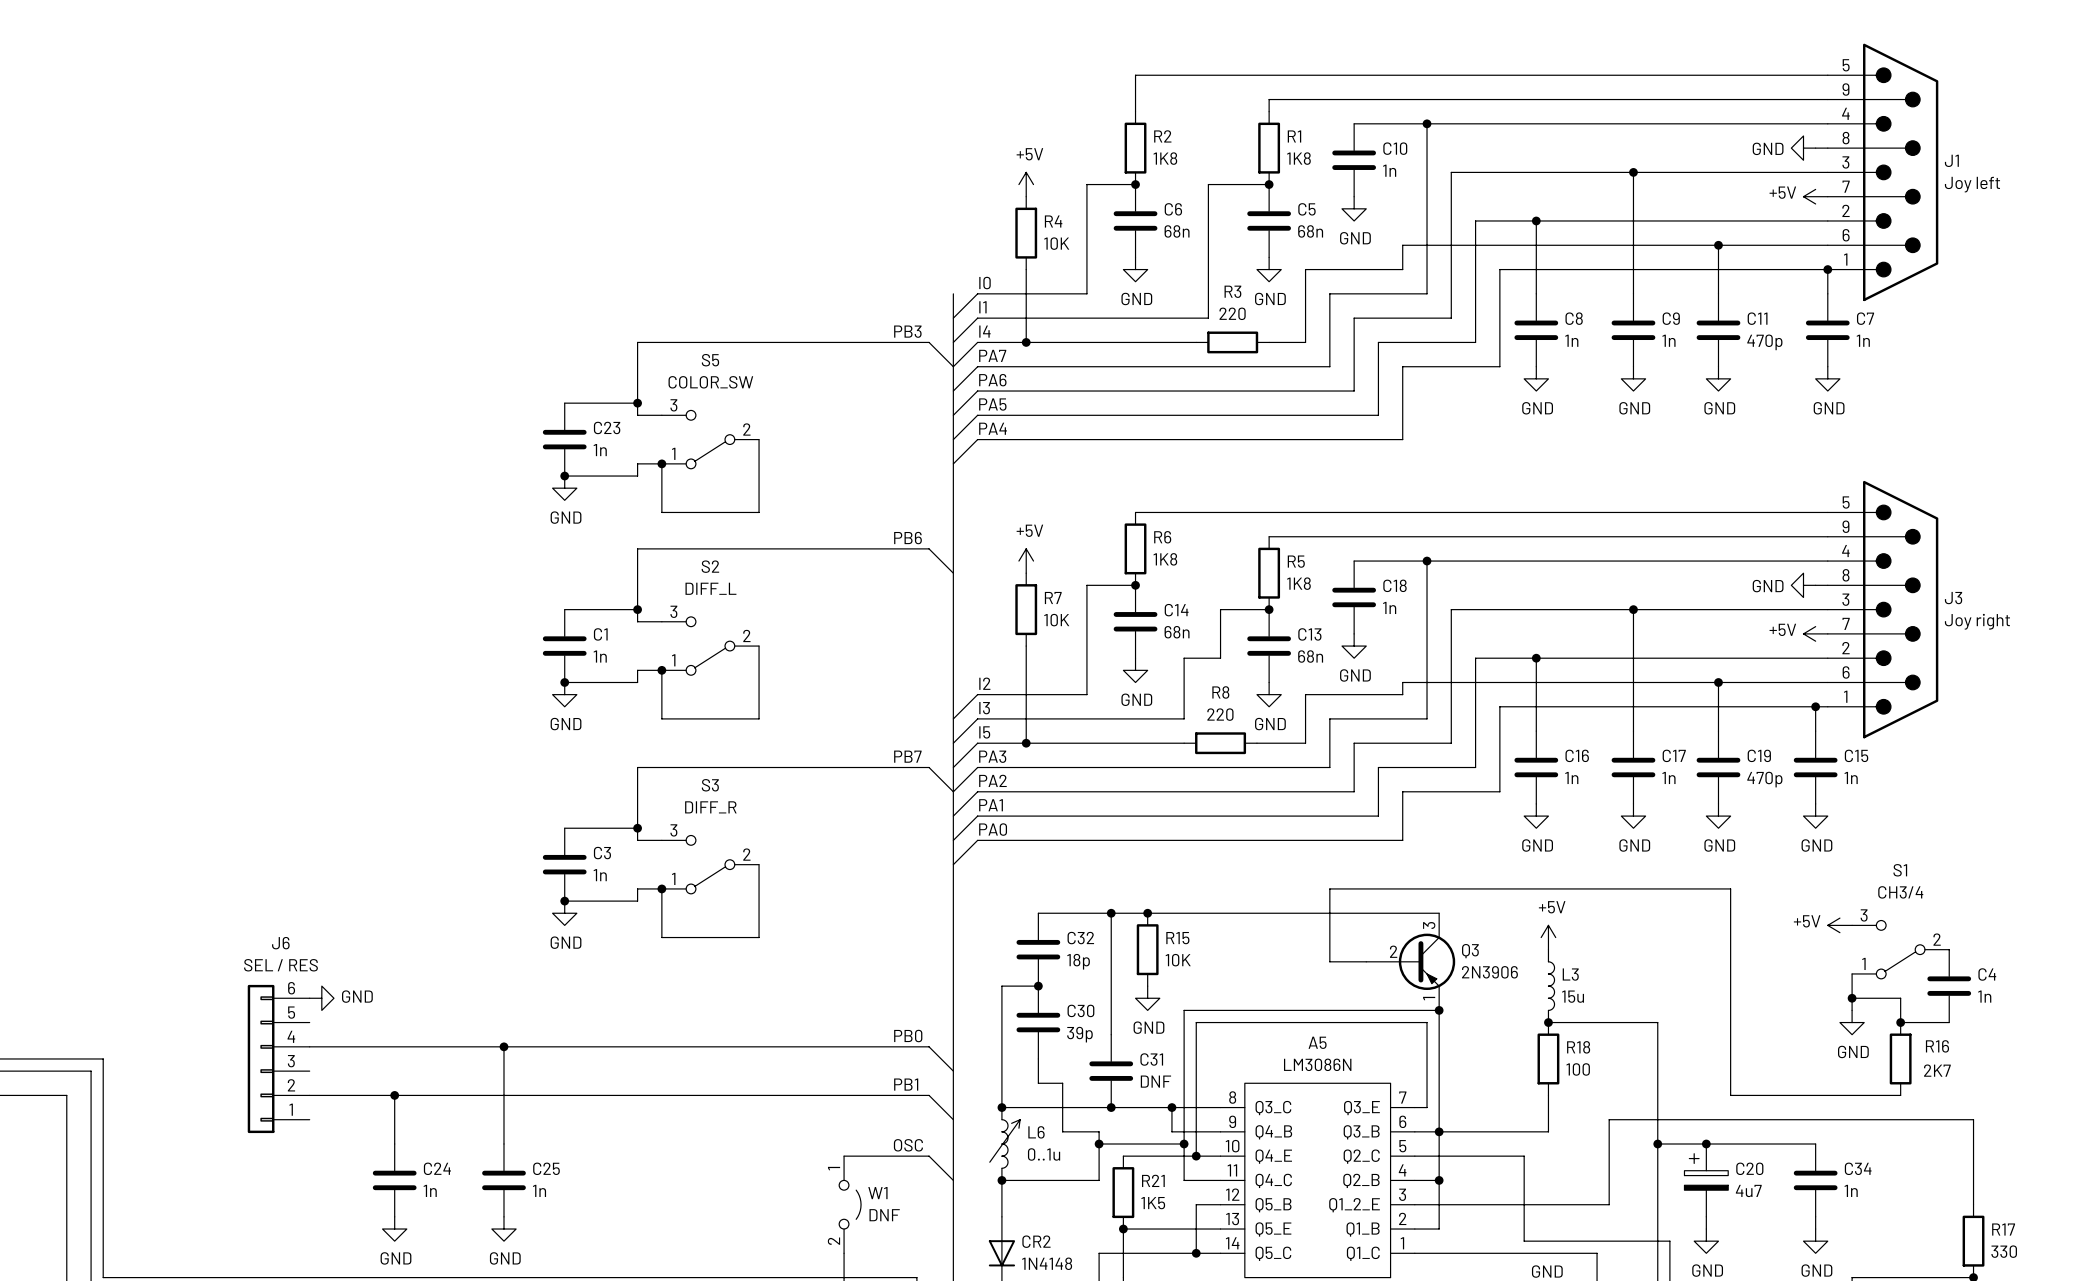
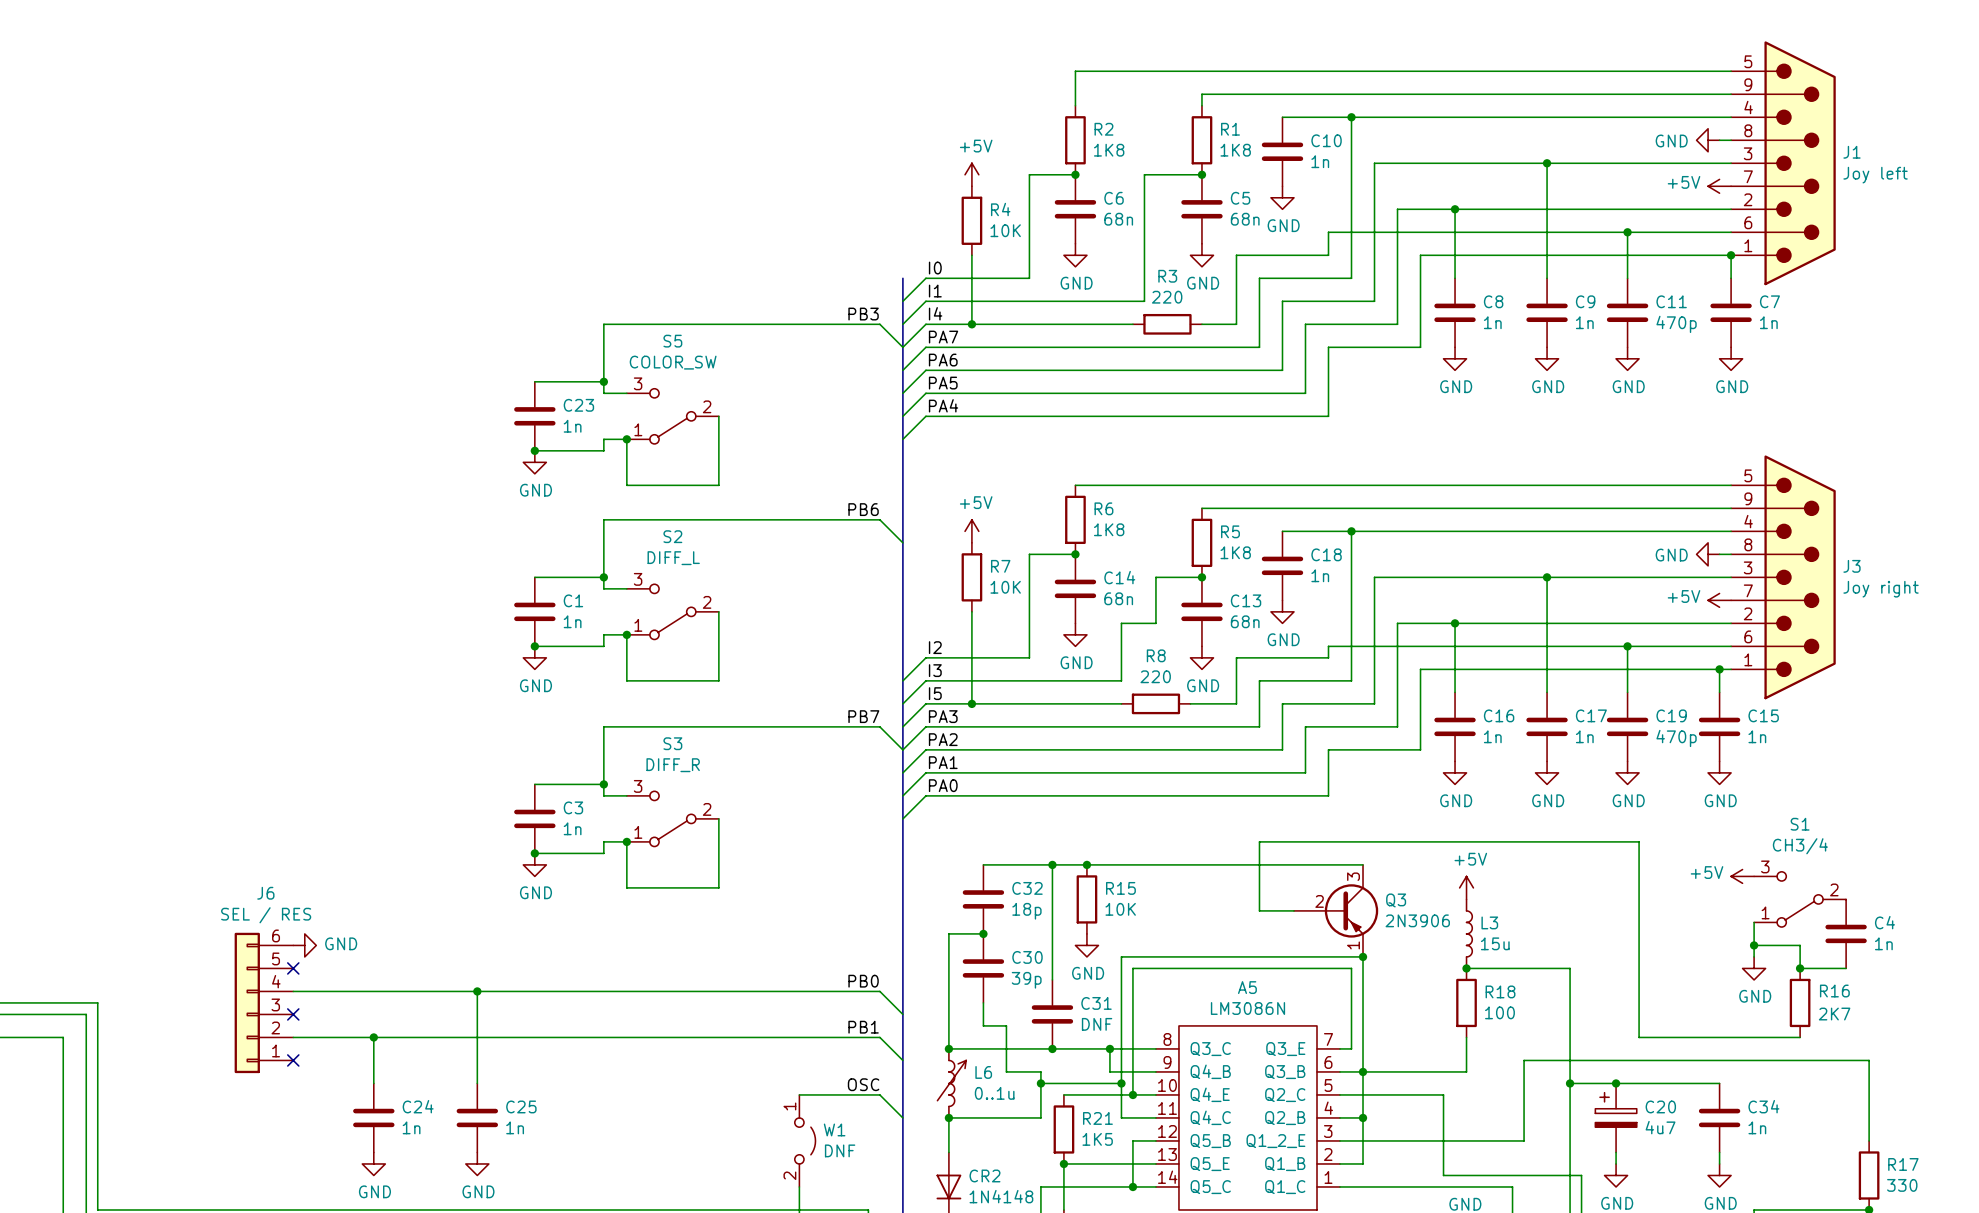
no-connect mark: none -> (293, 968)
no-connect mark: none -> (293, 1014)
no-connect mark: none -> (293, 1060)

